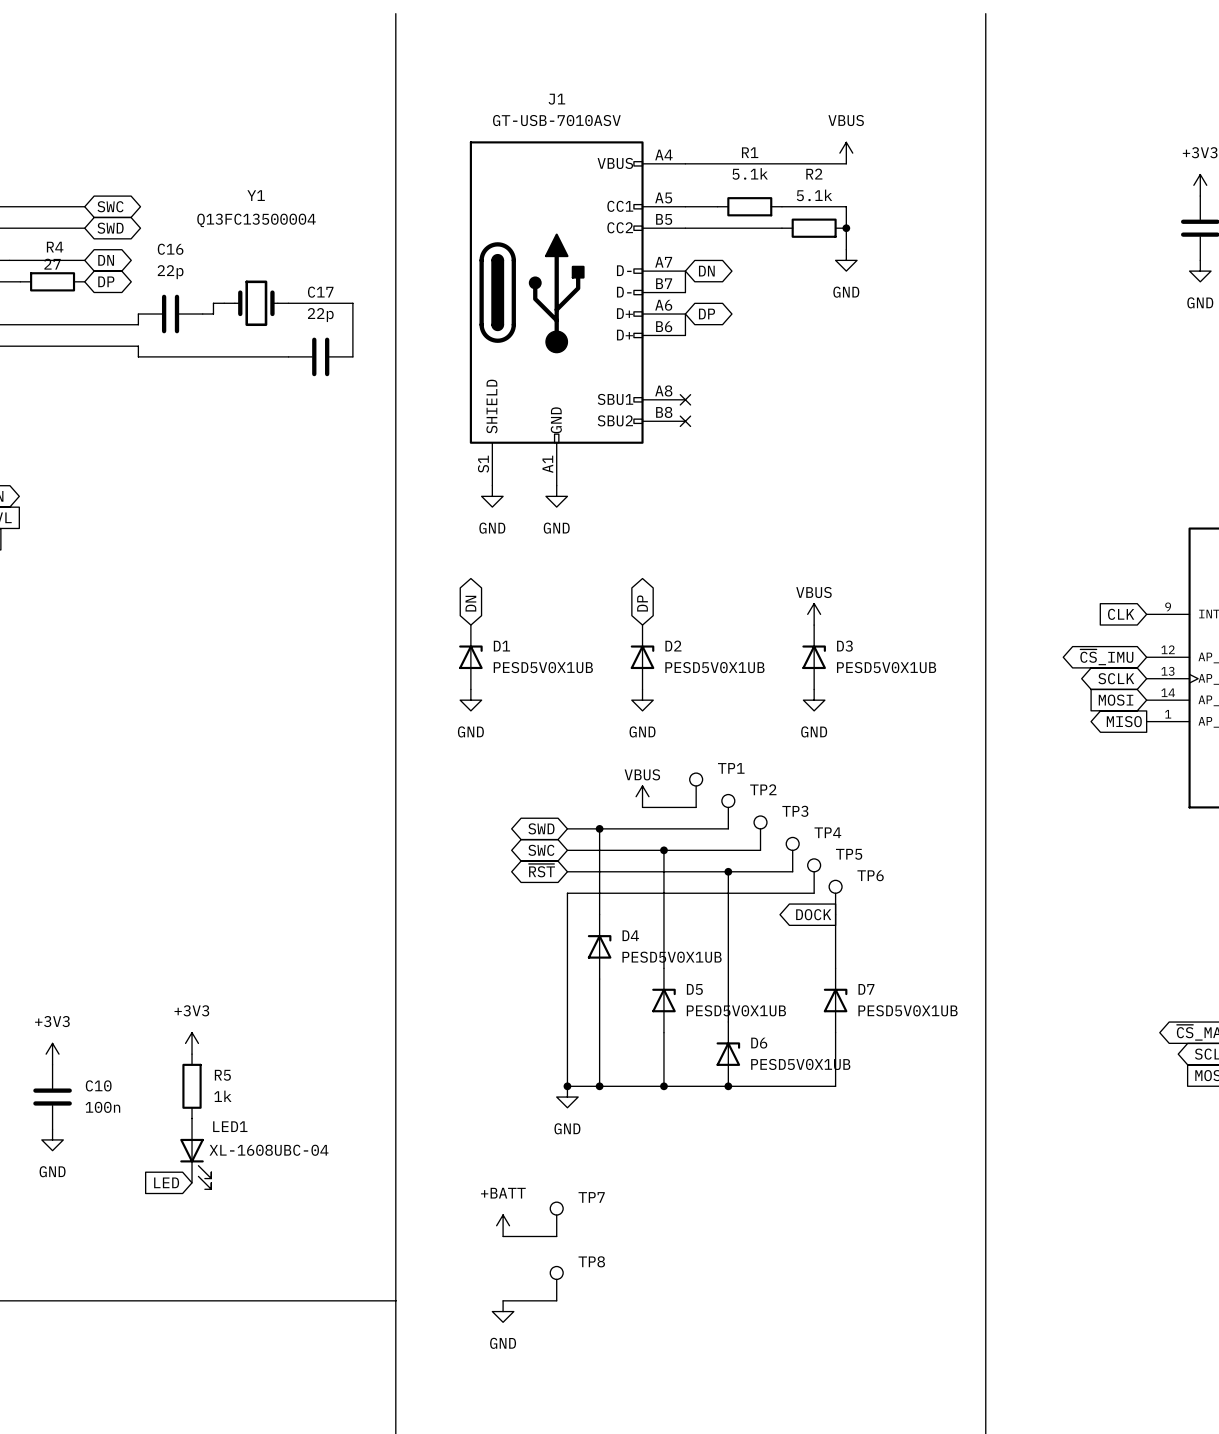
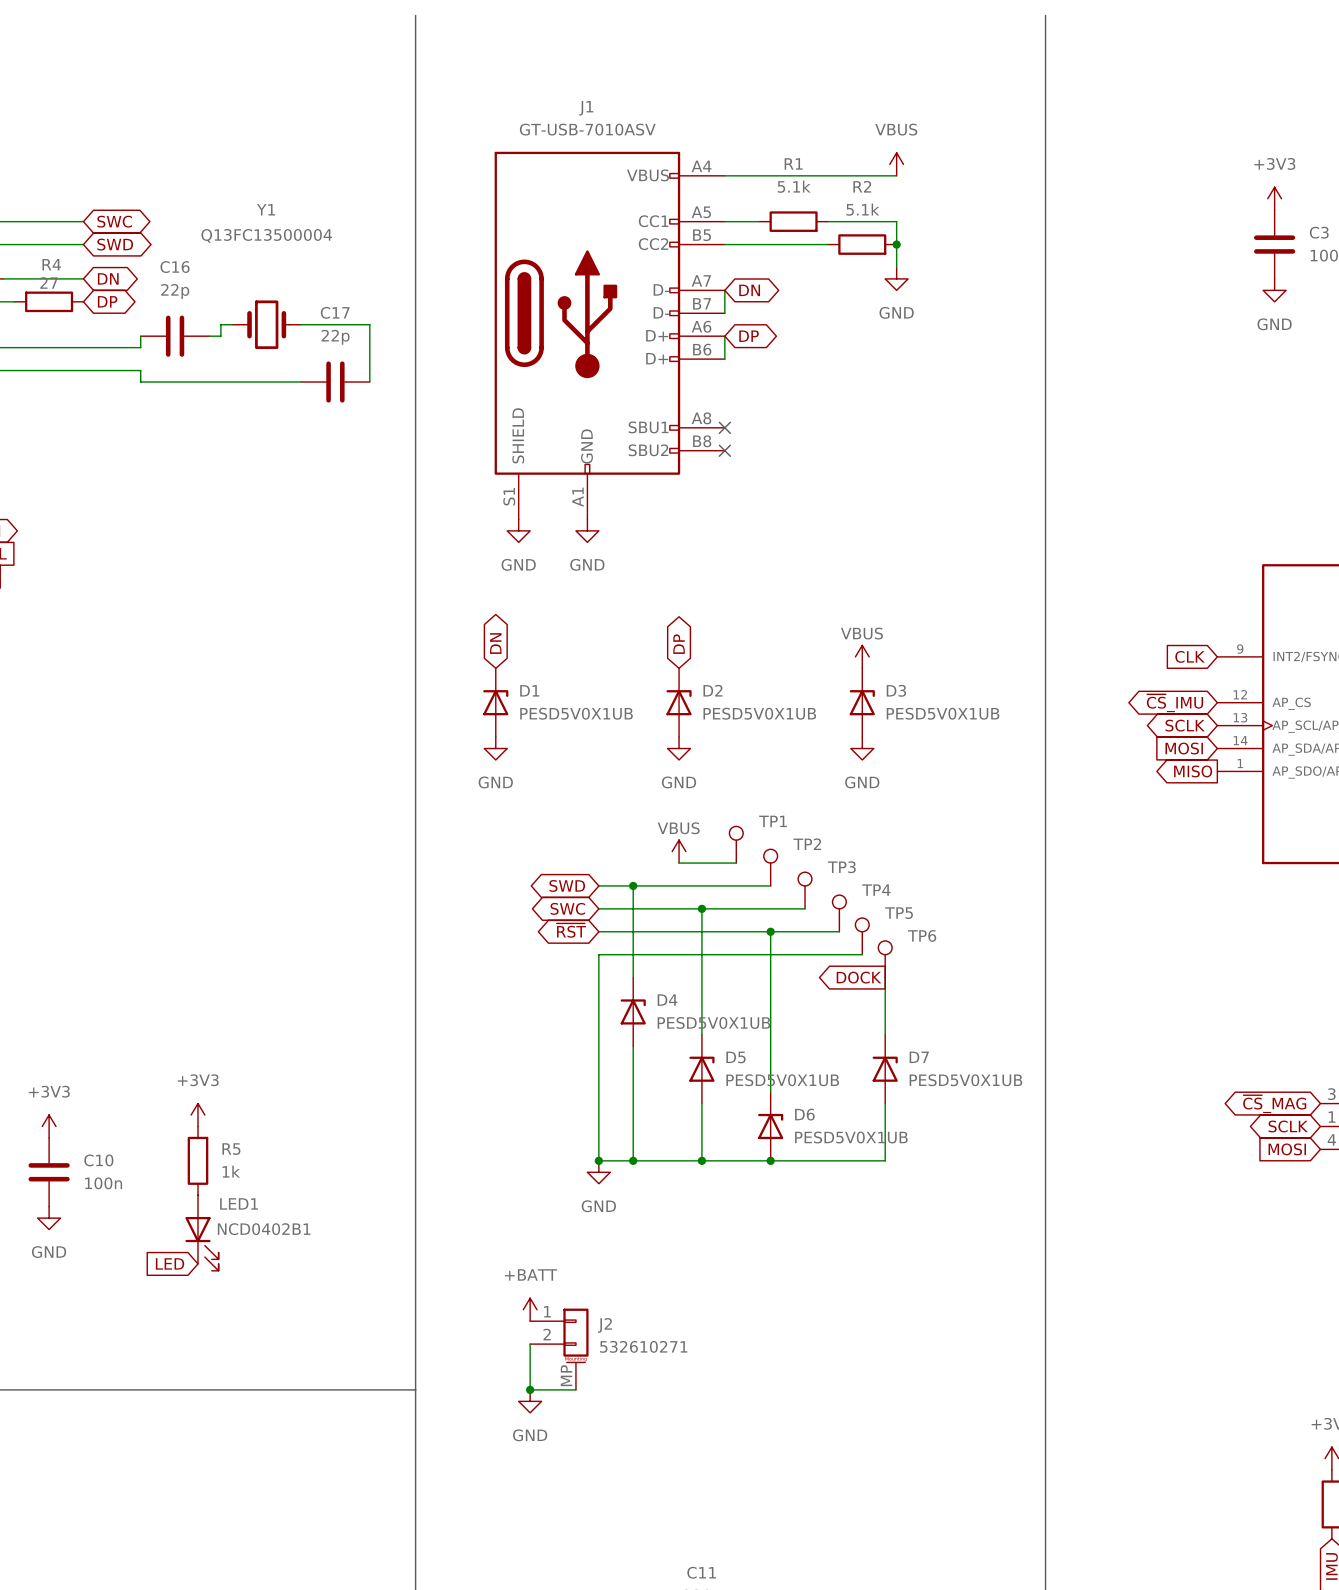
LED1 value: XL-1608UBC-04 (269, 1150) -> NCD0402B1 (264, 1229)
TP7: (556, 1219) -> none
wire: none -> (530, 1344) (530, 1389)
J2: none -> 532610271 (559, 1349)
TP8: (556, 1283) -> none
junction: none -> (530, 1389)
wire: (545, 1300) (556, 1300) -> none

